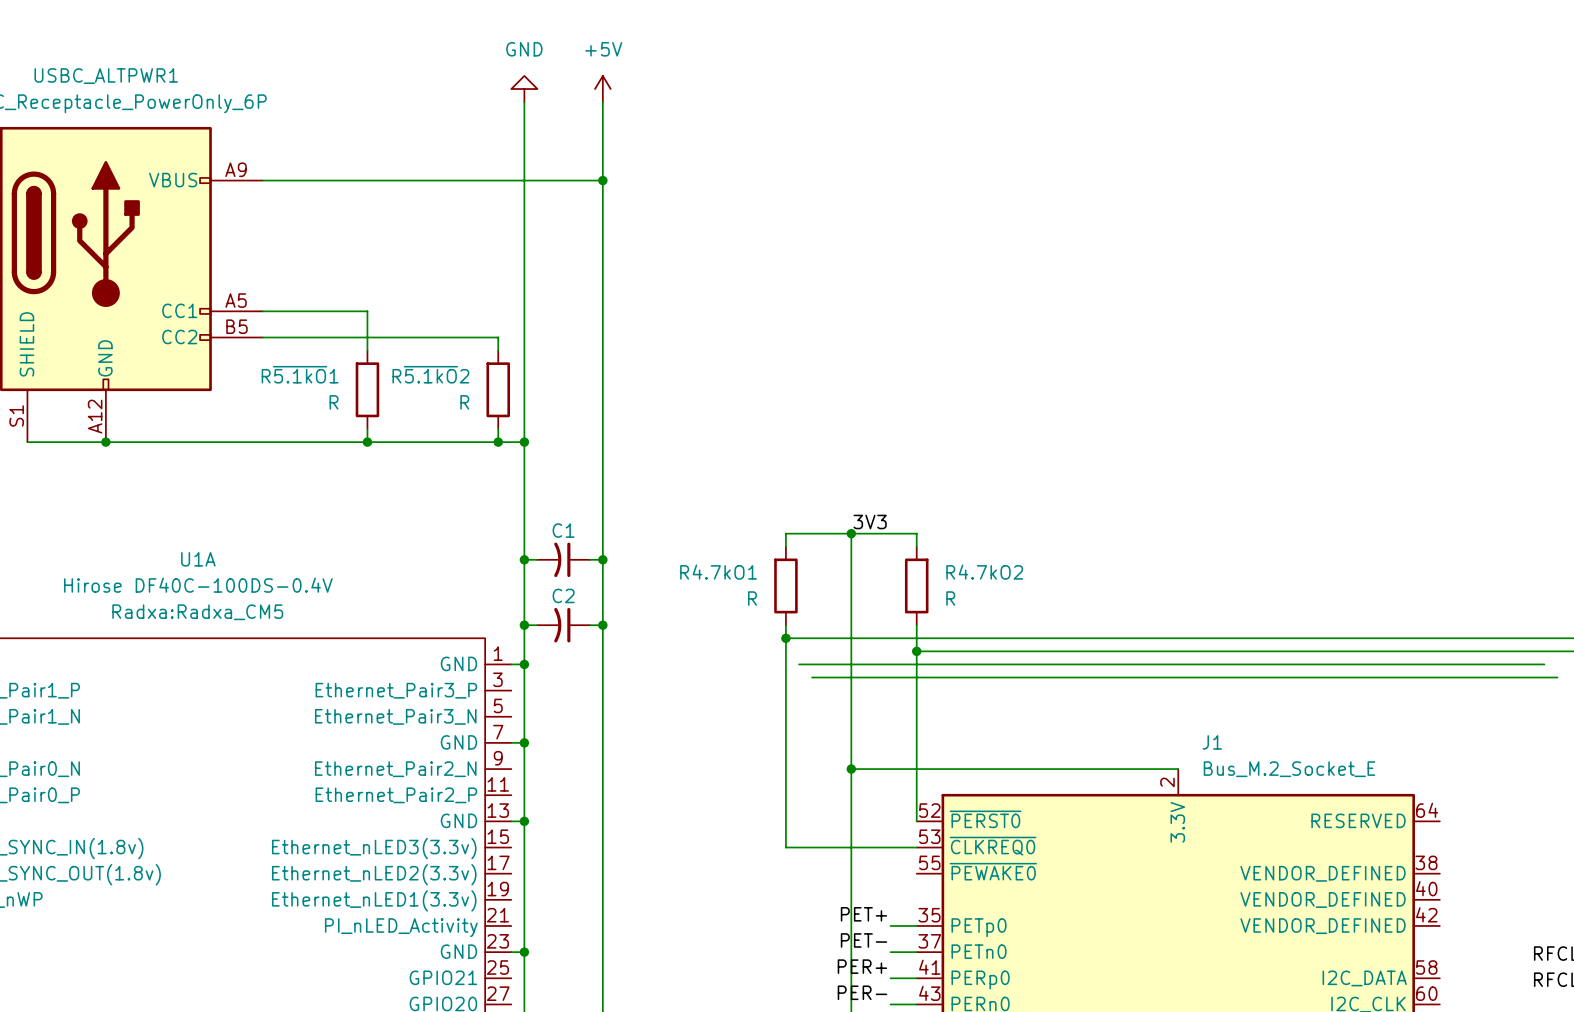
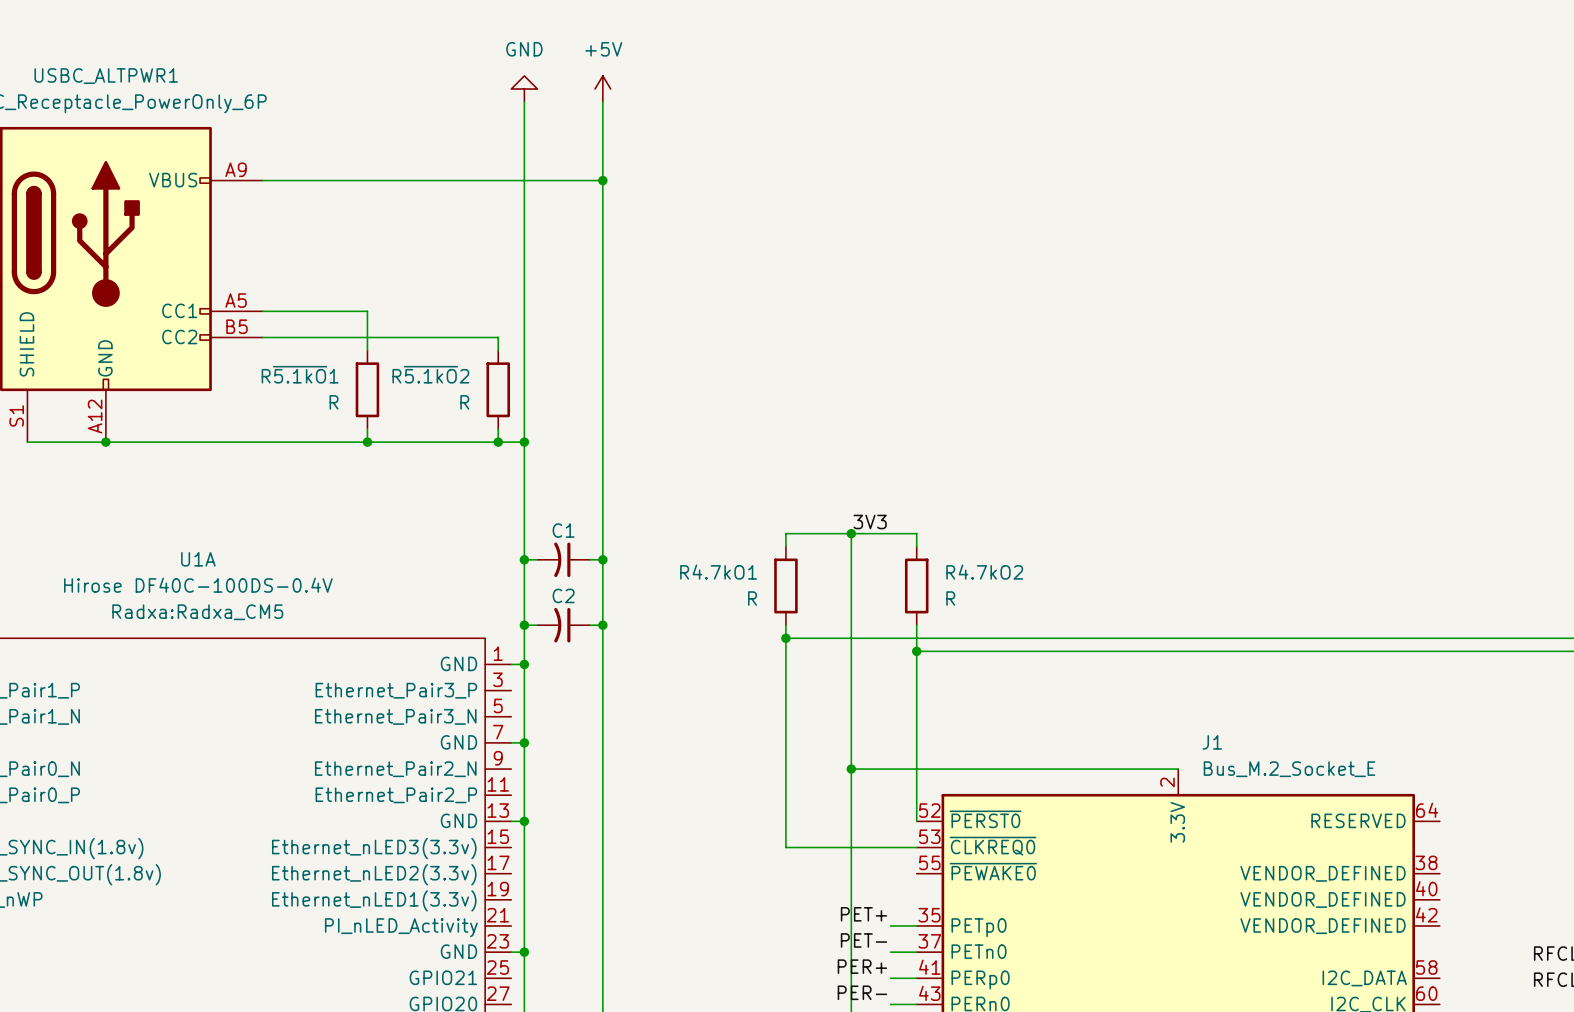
wire: (799, 664) (1544, 664) -> none
wire: (812, 677) (1557, 677) -> none

